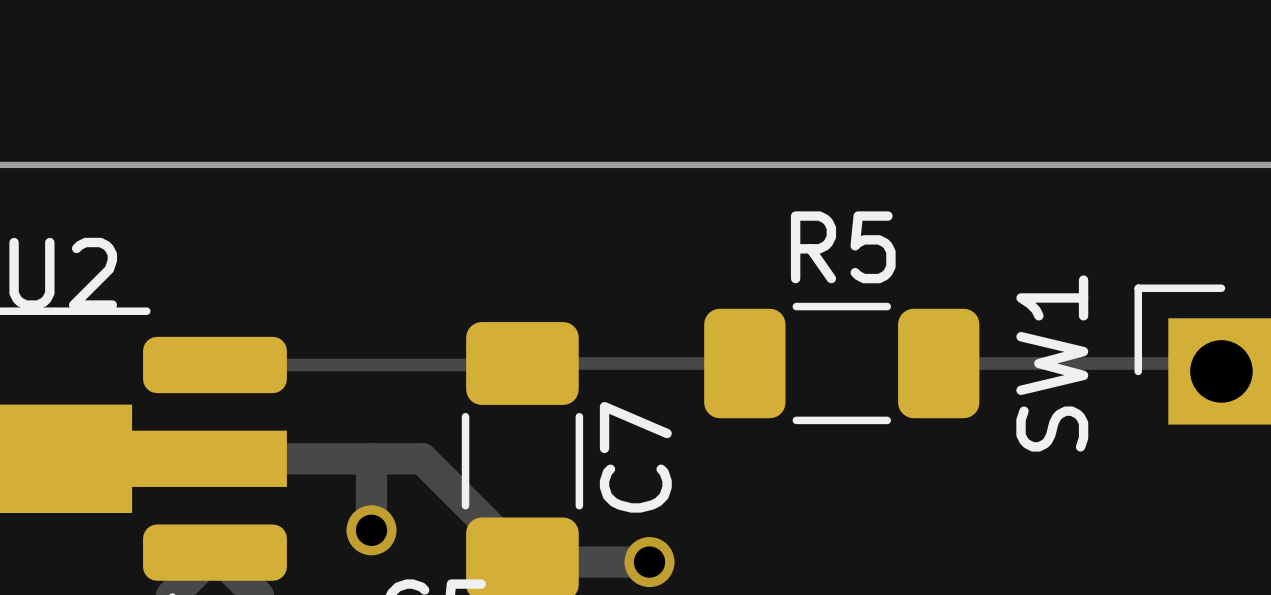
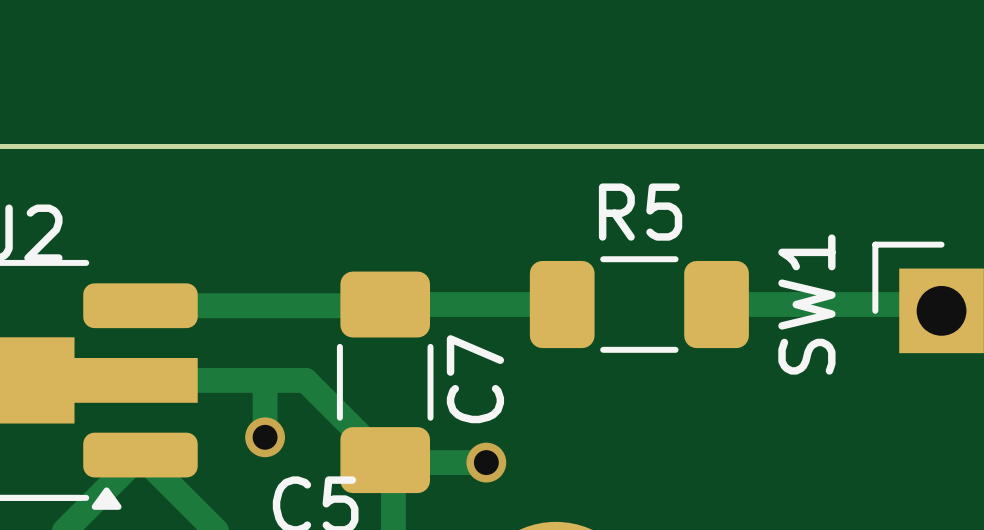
track width: thin (744, 363) (214, 364) -> thick (562, 304) (140, 305)
track width: thin (938, 363) (1213, 363) (1221, 371) -> thick (716, 304) (935, 304) (941, 310)

